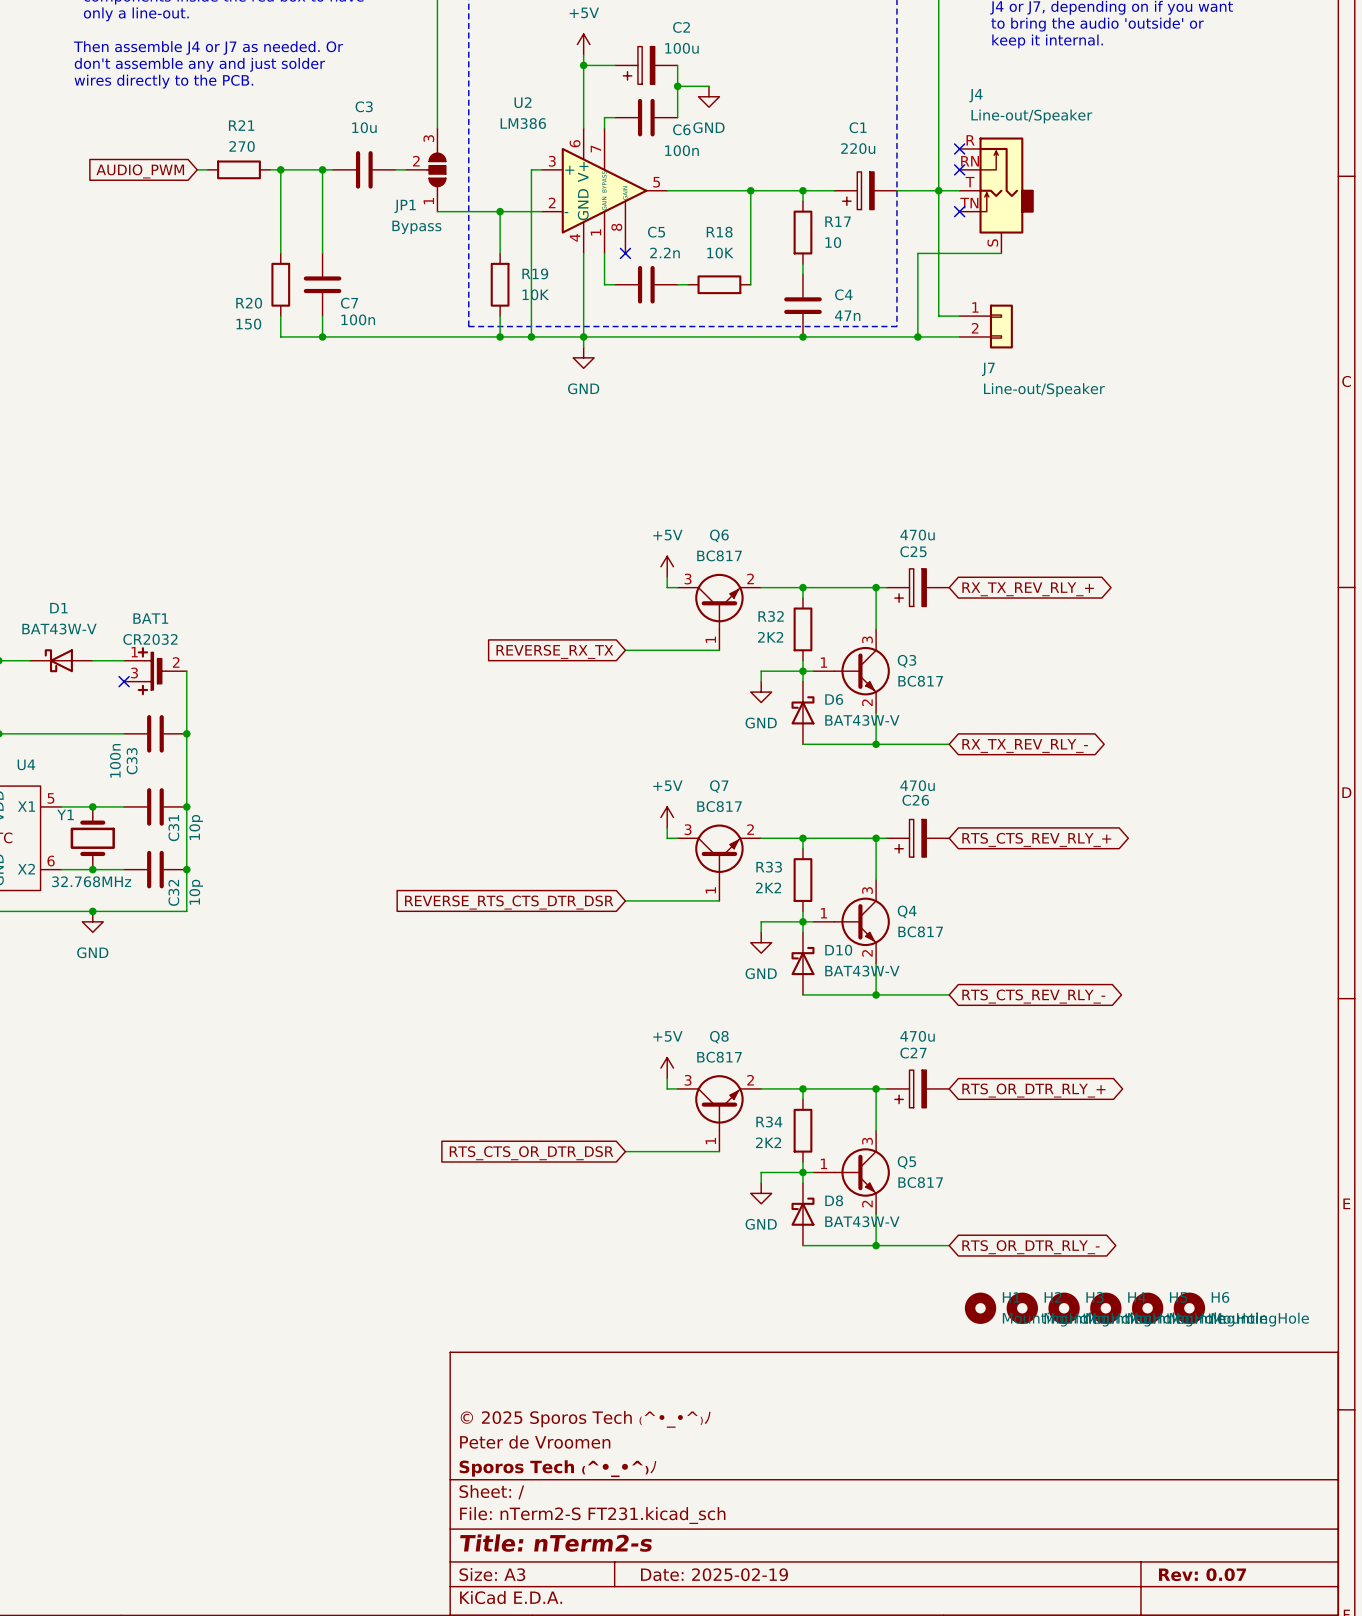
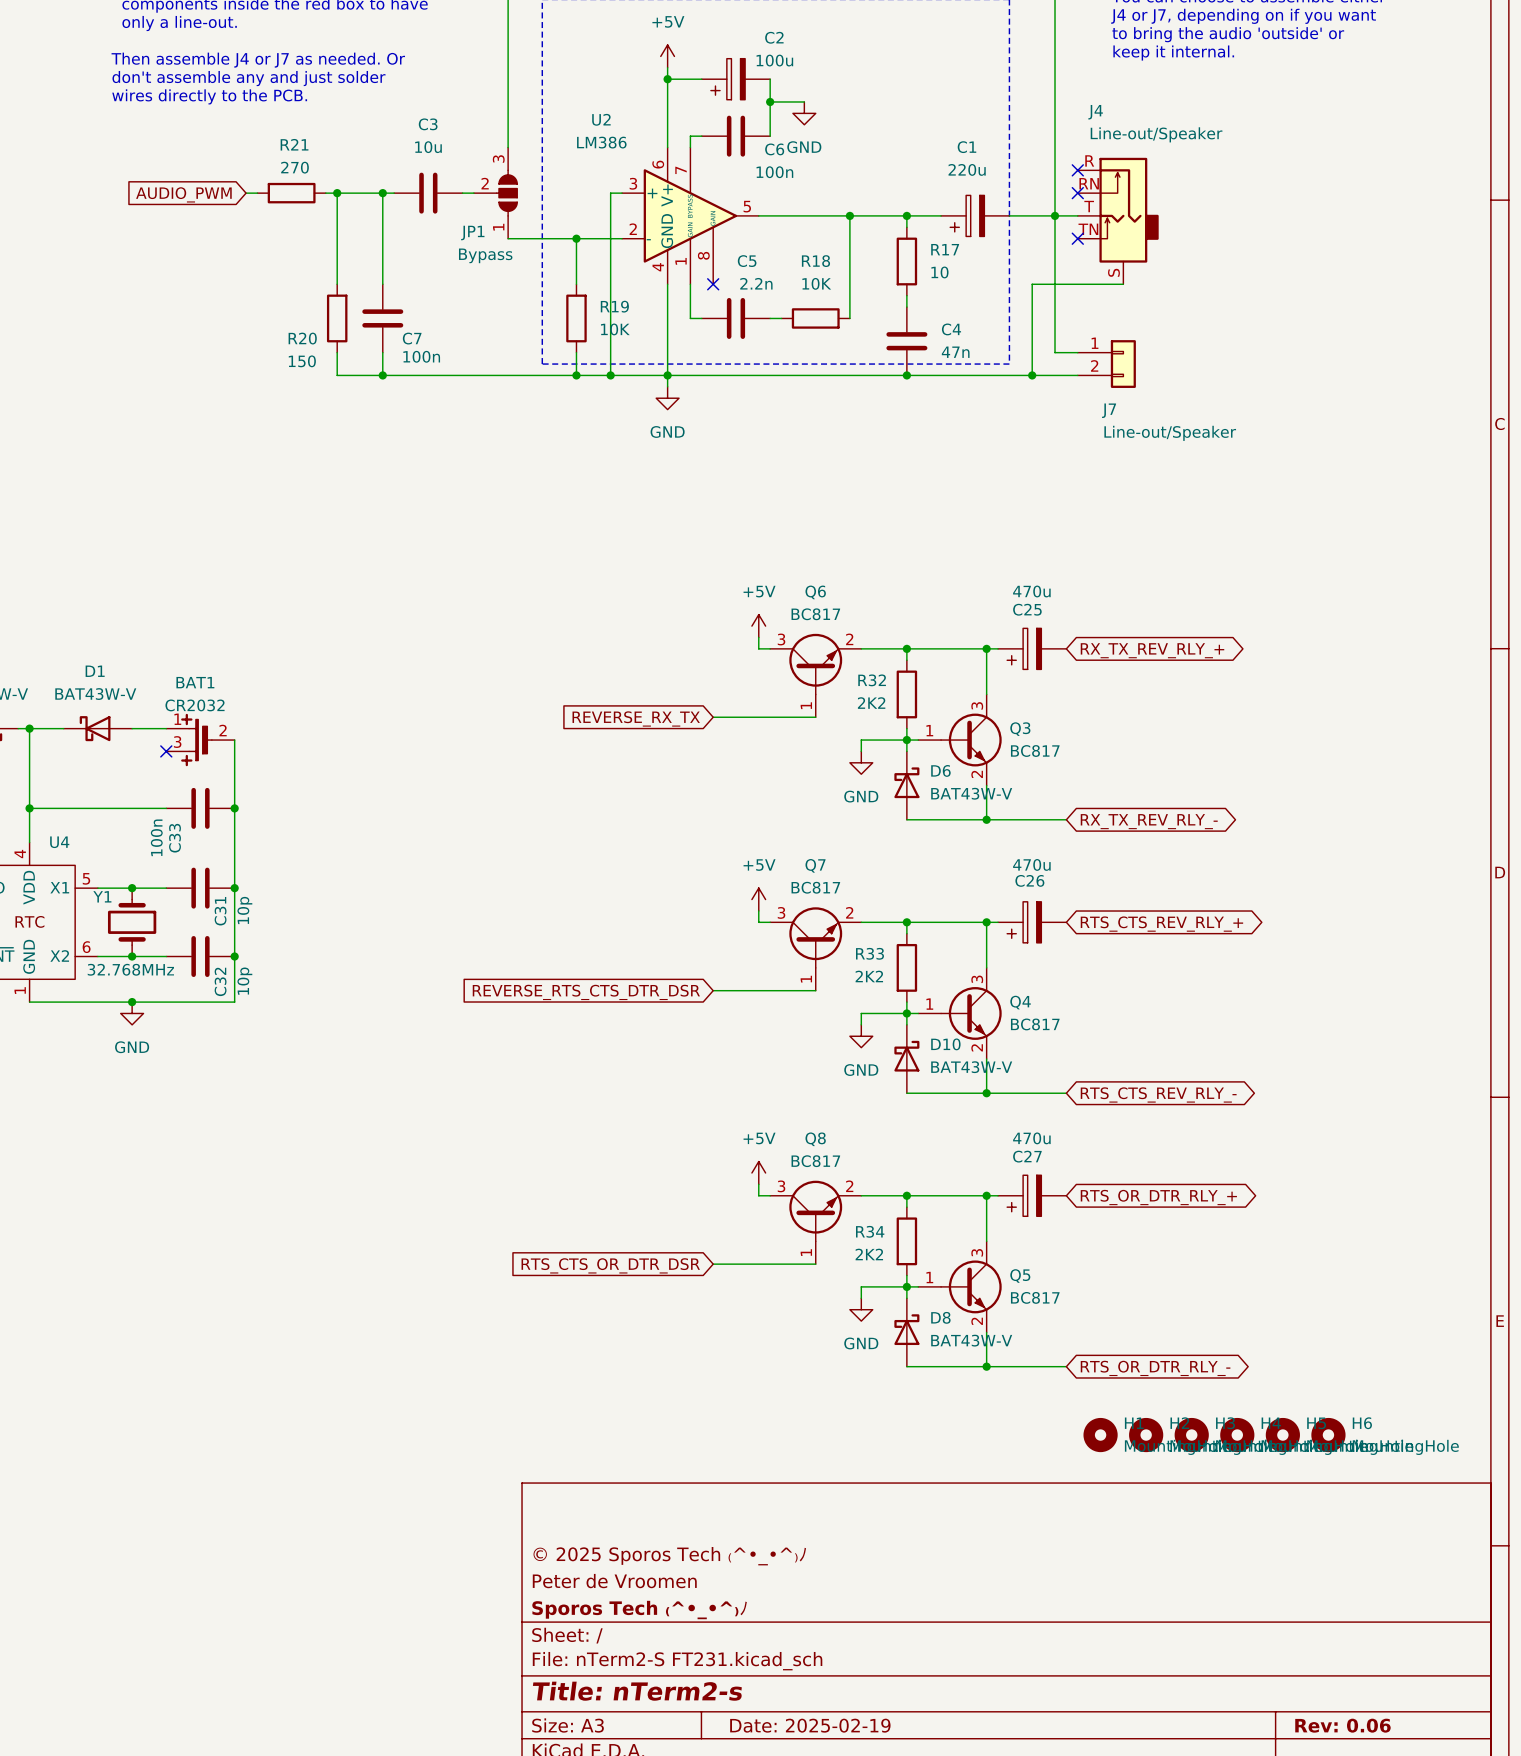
title block: Rev: 0.07 (1202, 1574) -> Rev: 0.06 (1342, 1725)

